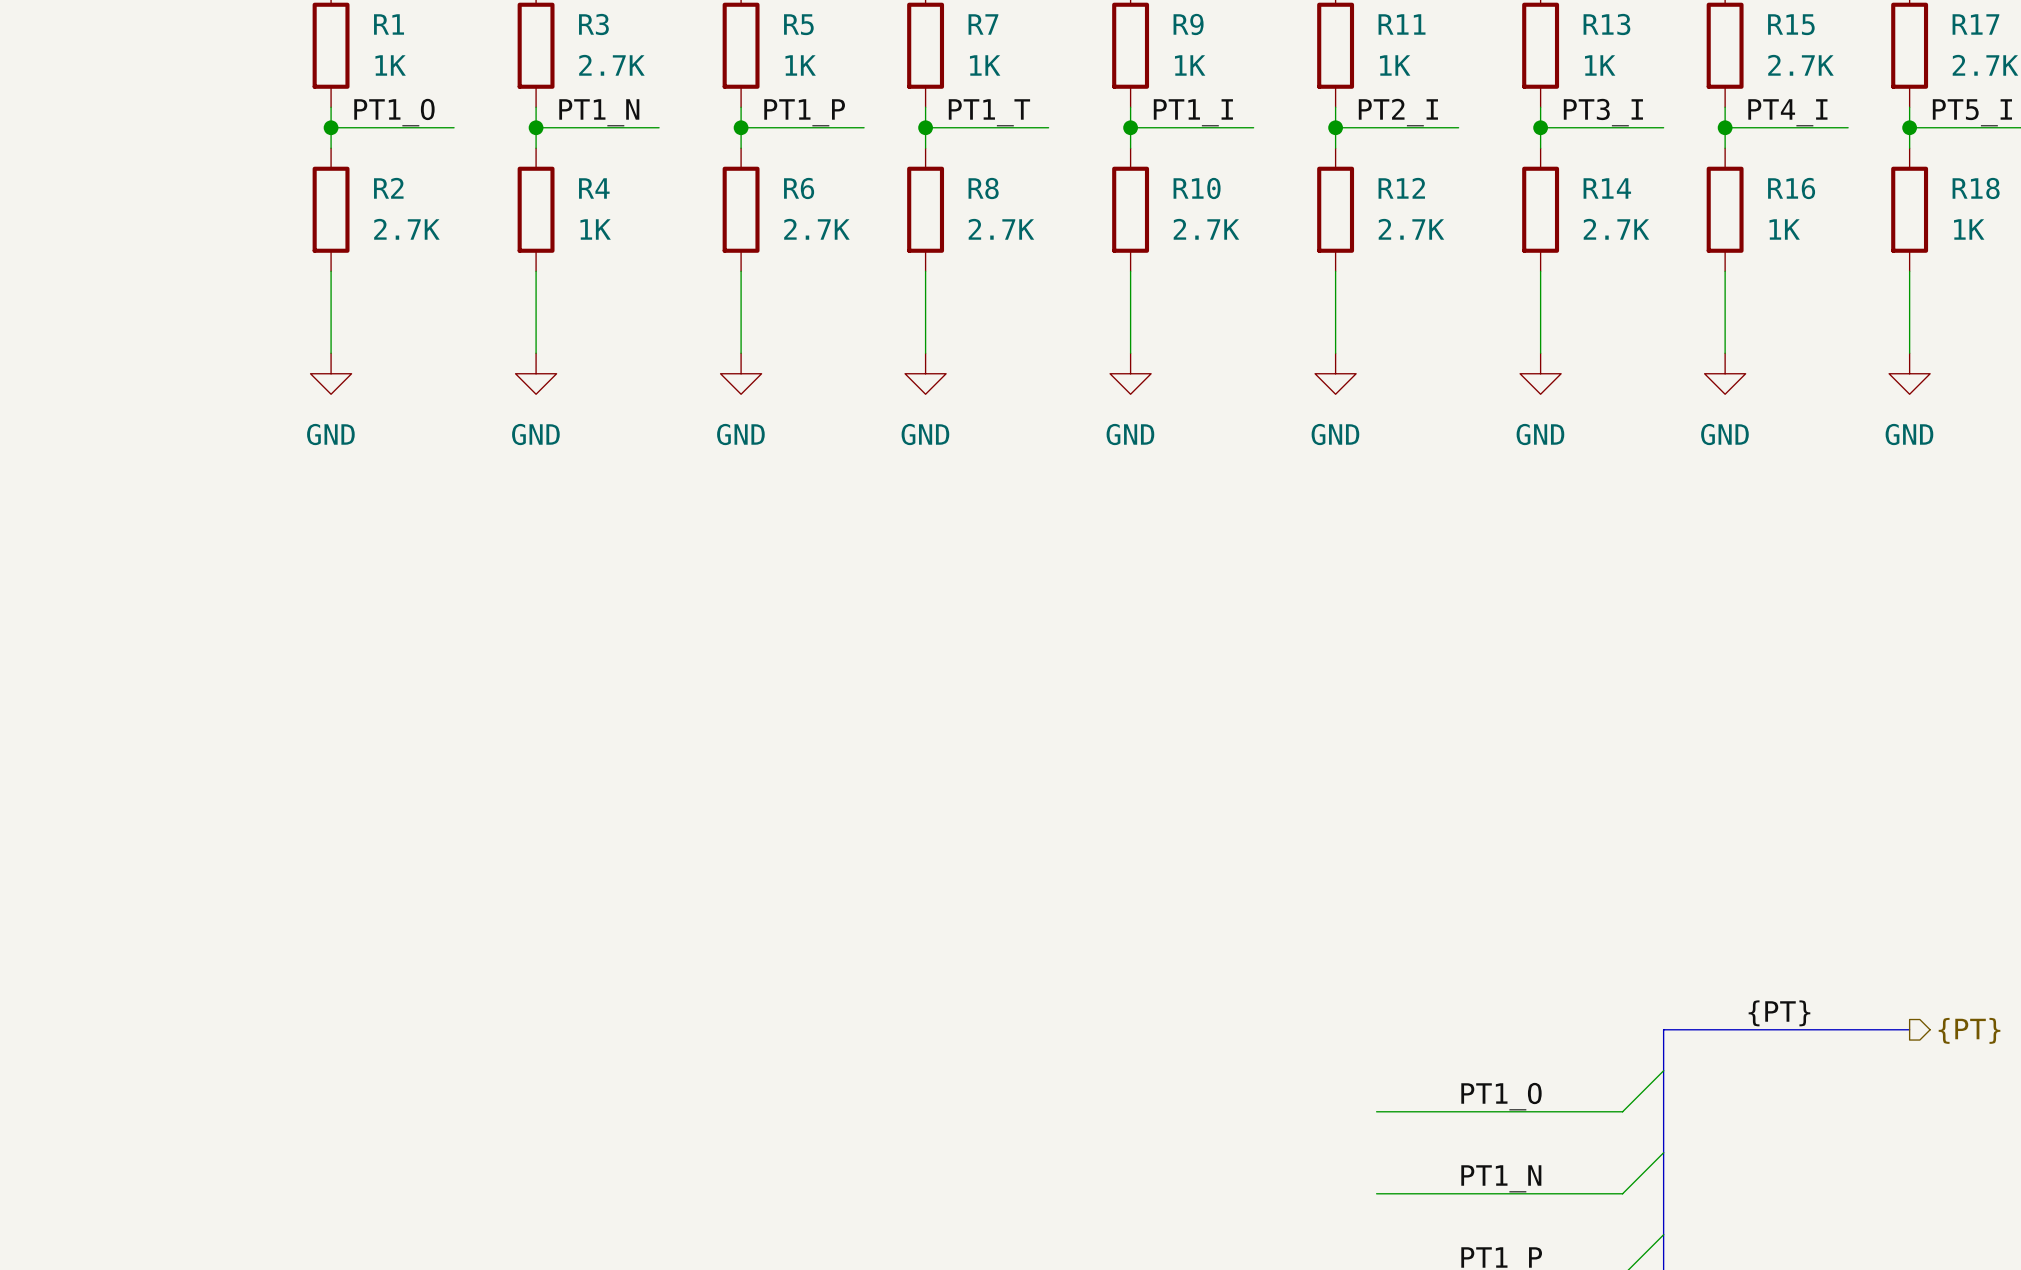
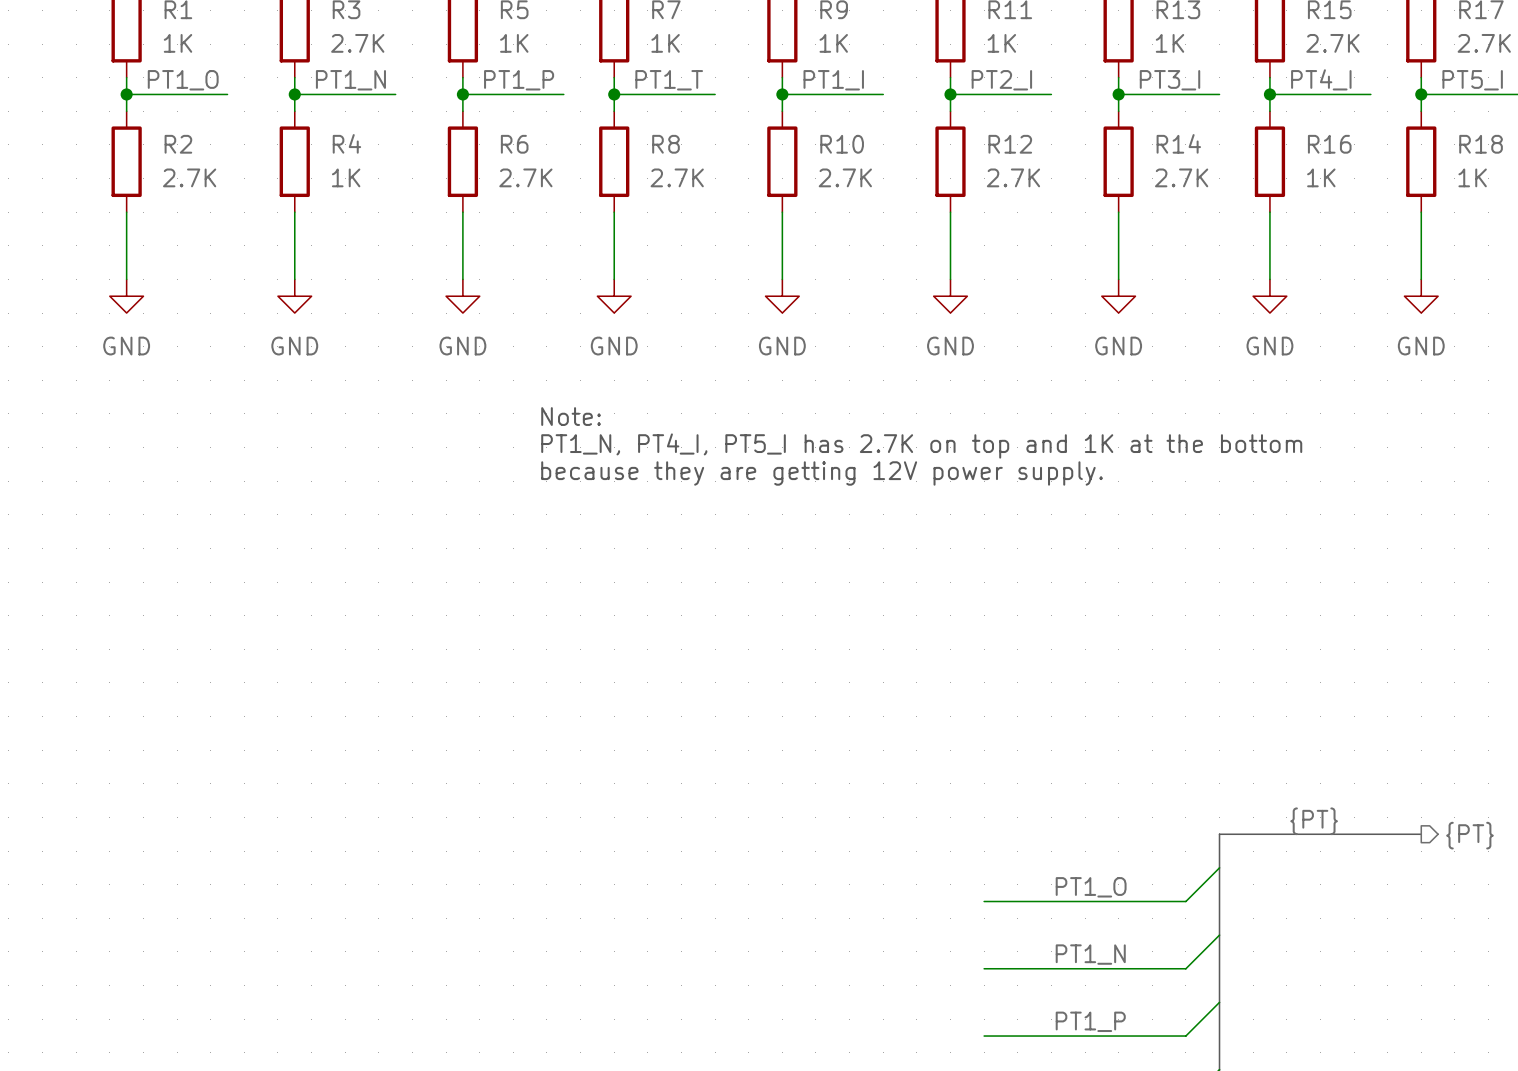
text: none -> Note: (571, 416)
text: none -> PT1_N, PT4_I, PT5_I has 2.7K on top and 1K at the bottom (921, 446)
text: none -> because they are getting 12V power supply. (822, 473)

